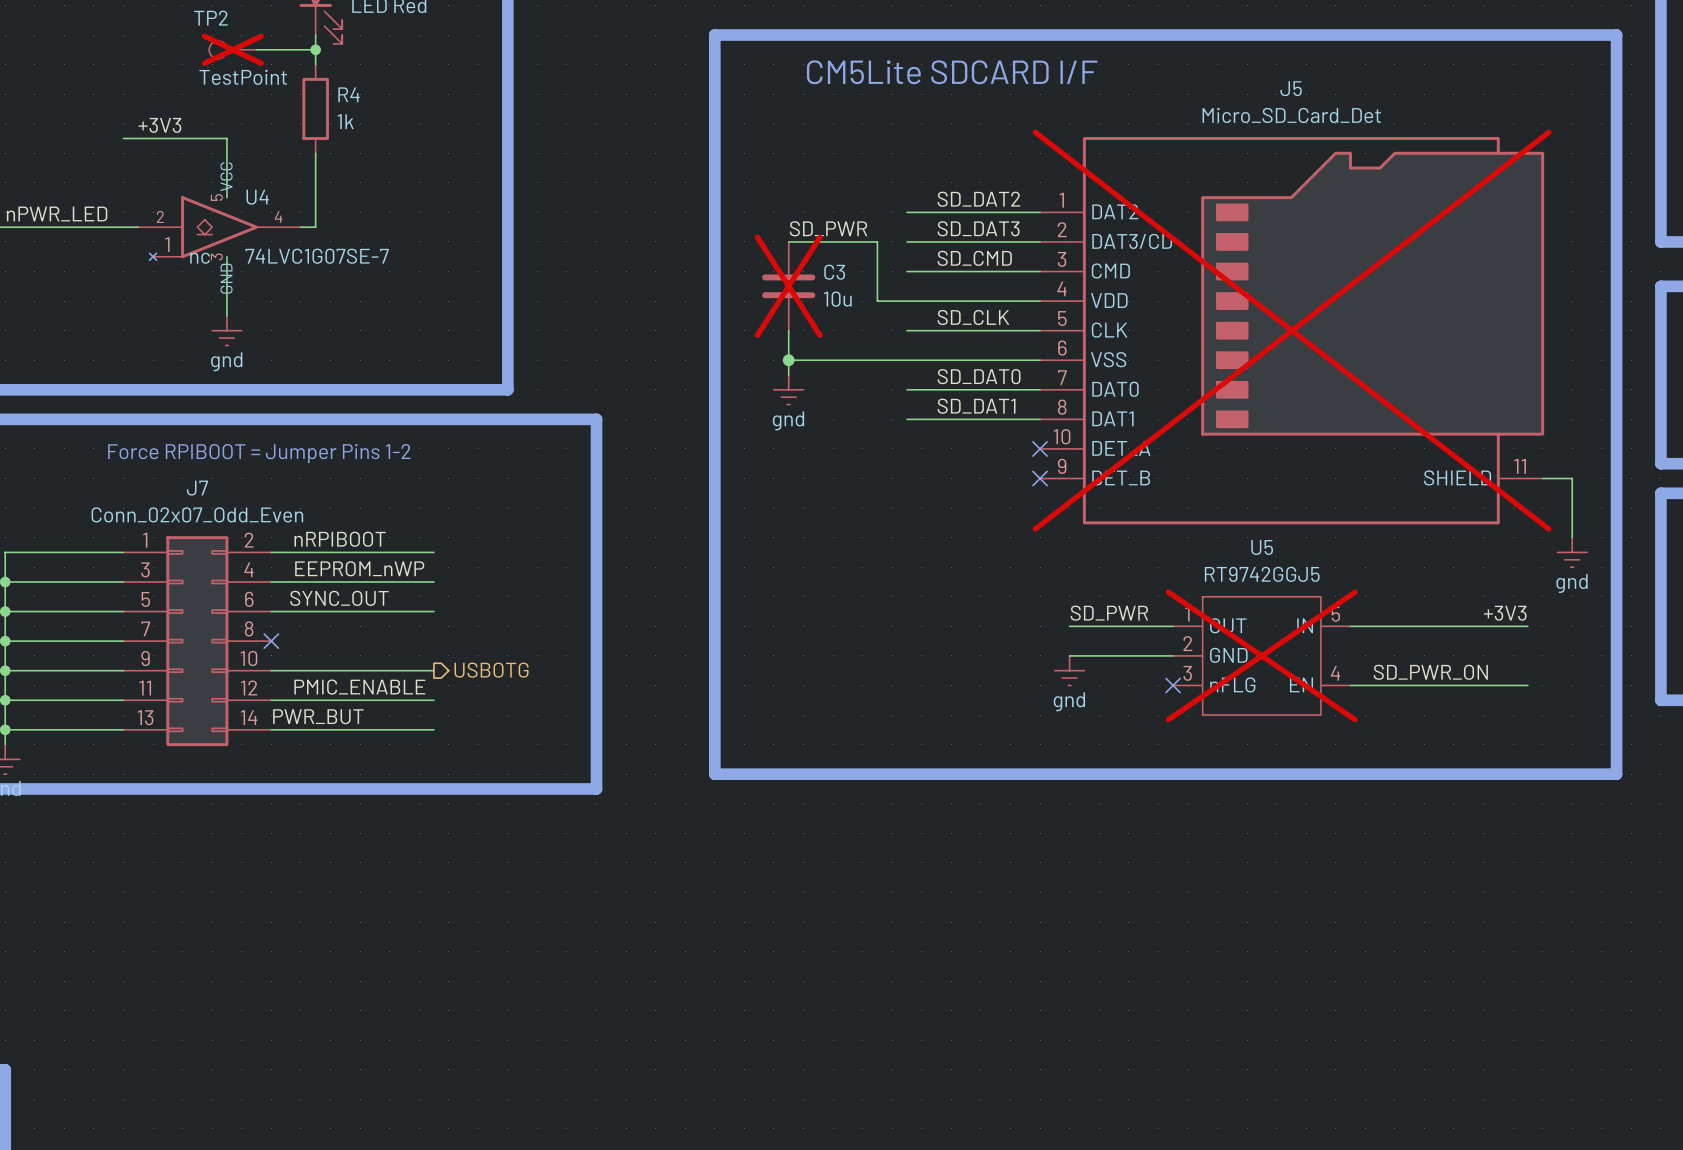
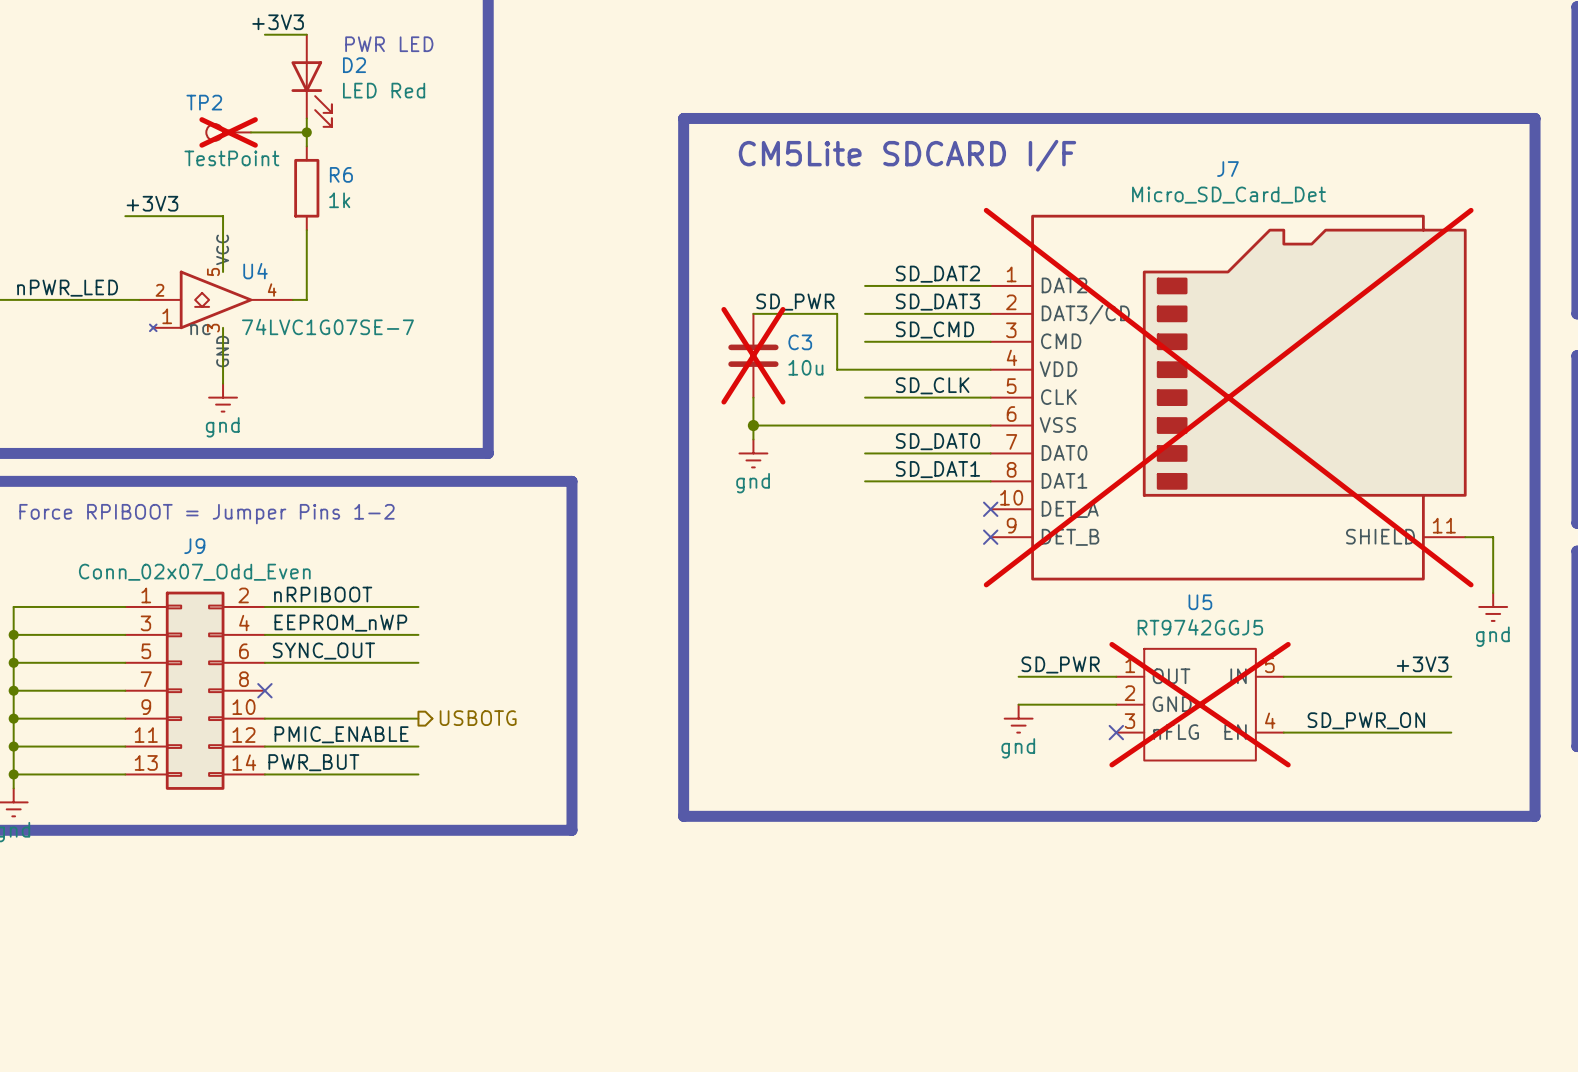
J5 name: J5 (1291, 88) -> J7 (1227, 169)
R4 name: R4 (348, 94) -> R6 (341, 174)
J7 name: J7 (197, 488) -> J9 (194, 546)

